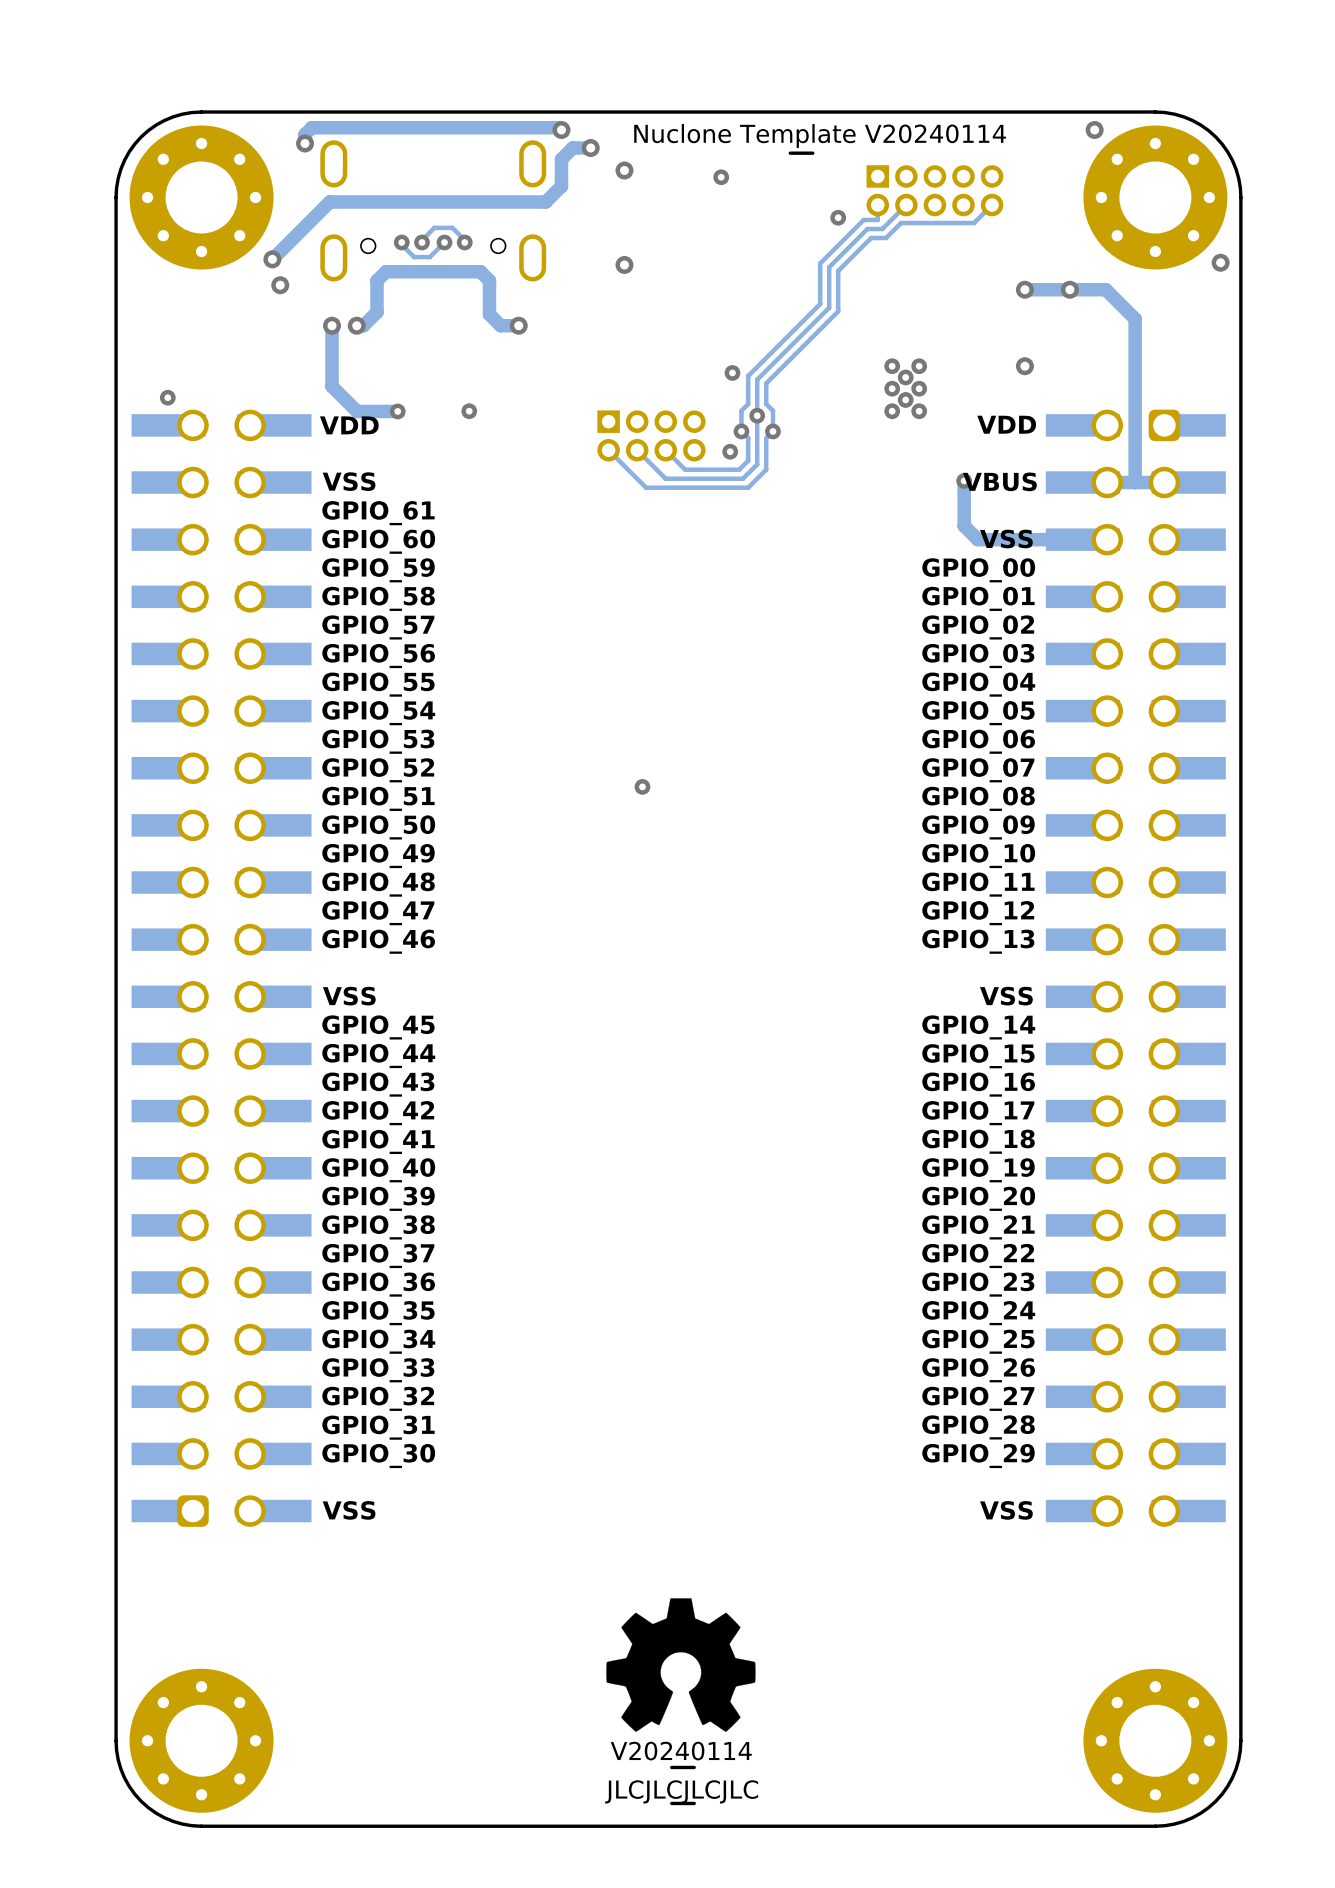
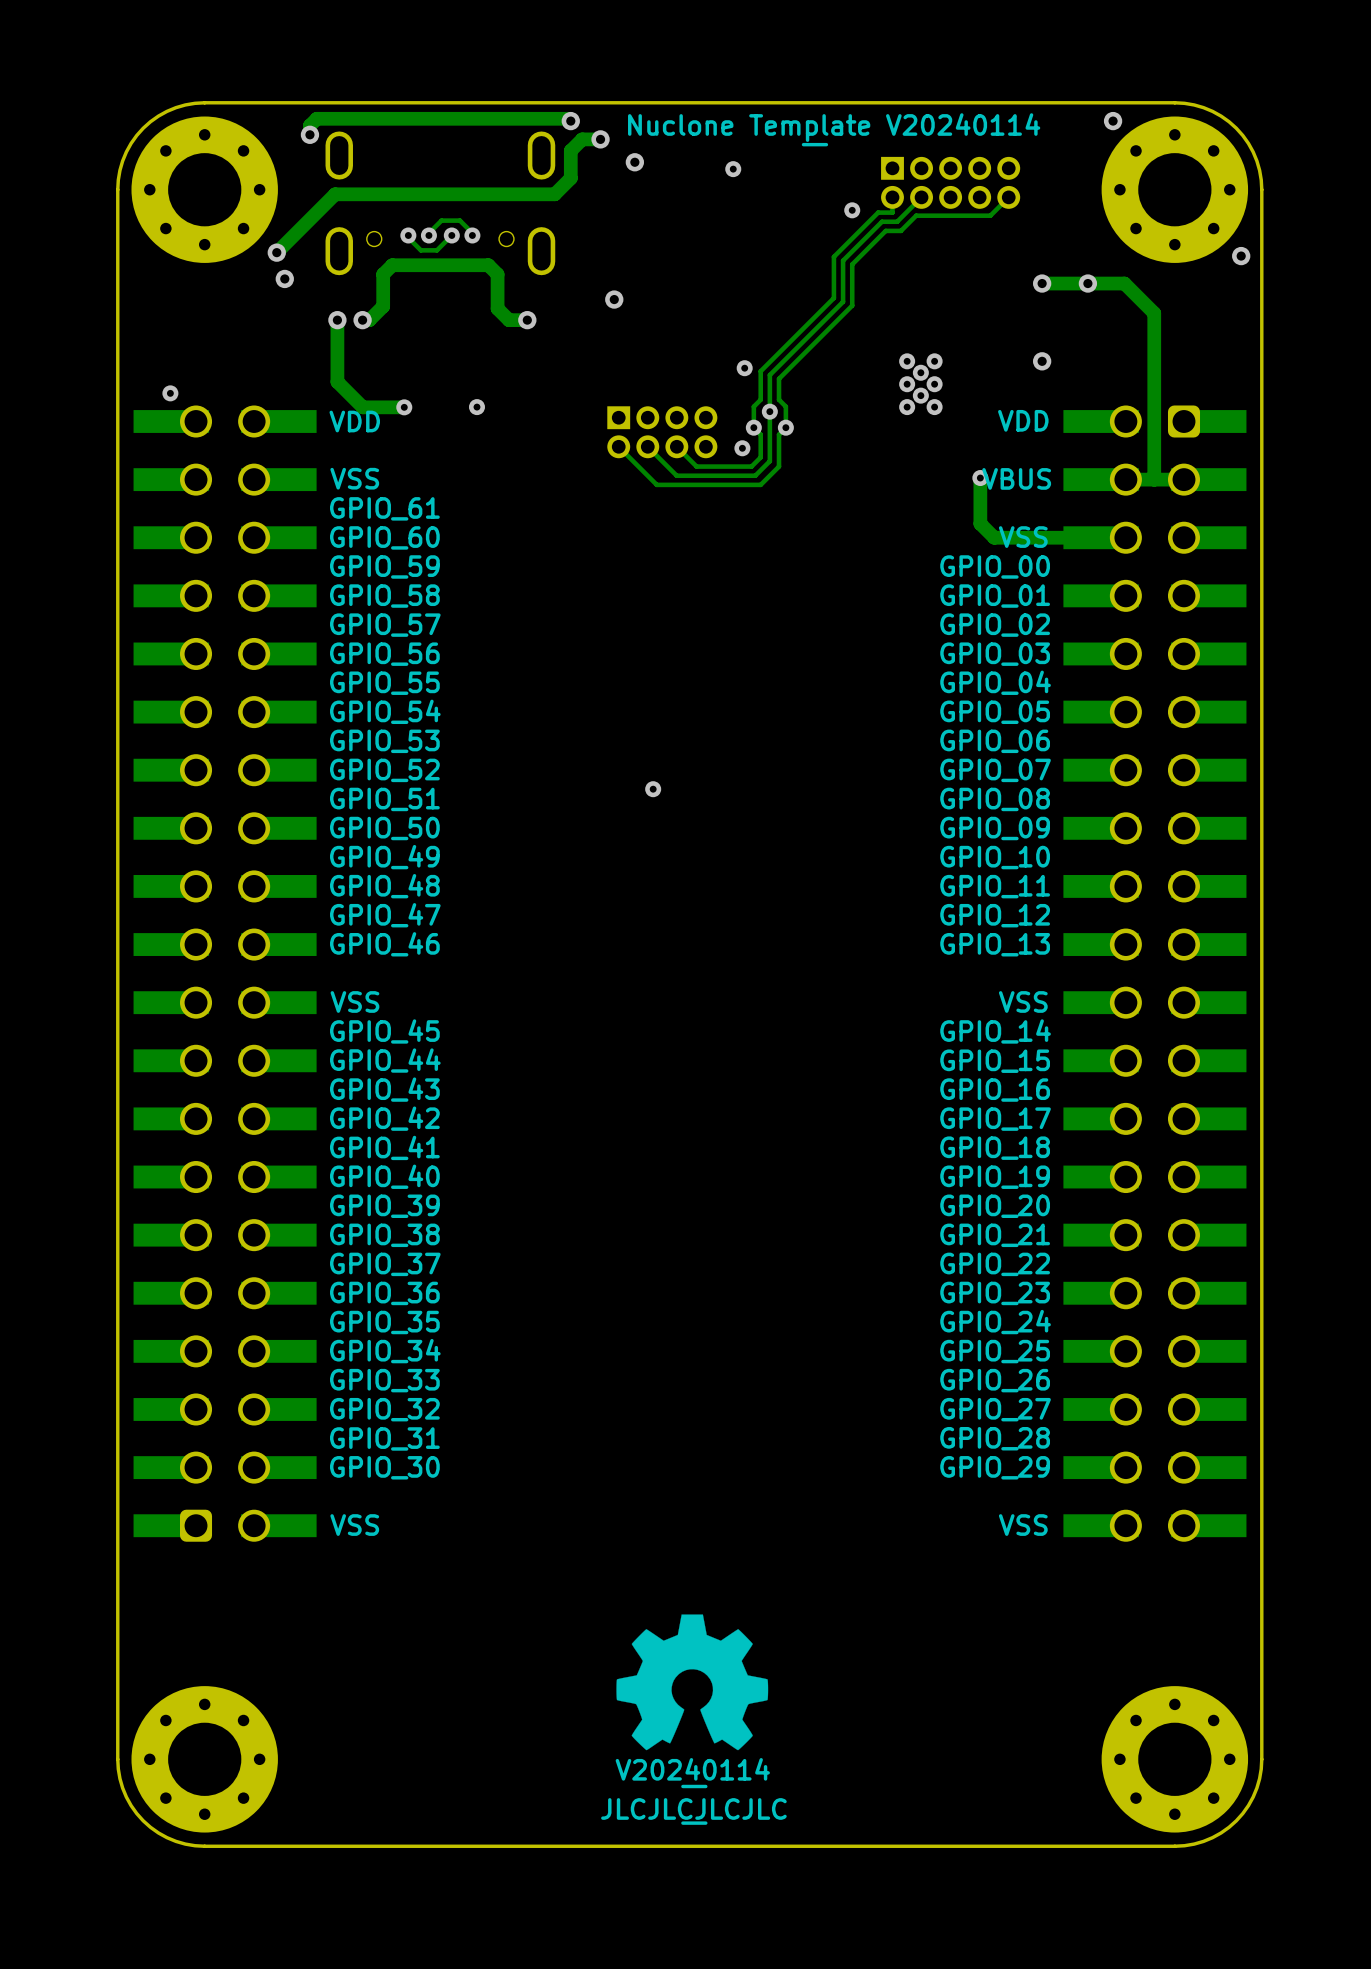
via position: (624, 264) -> (614, 299)

